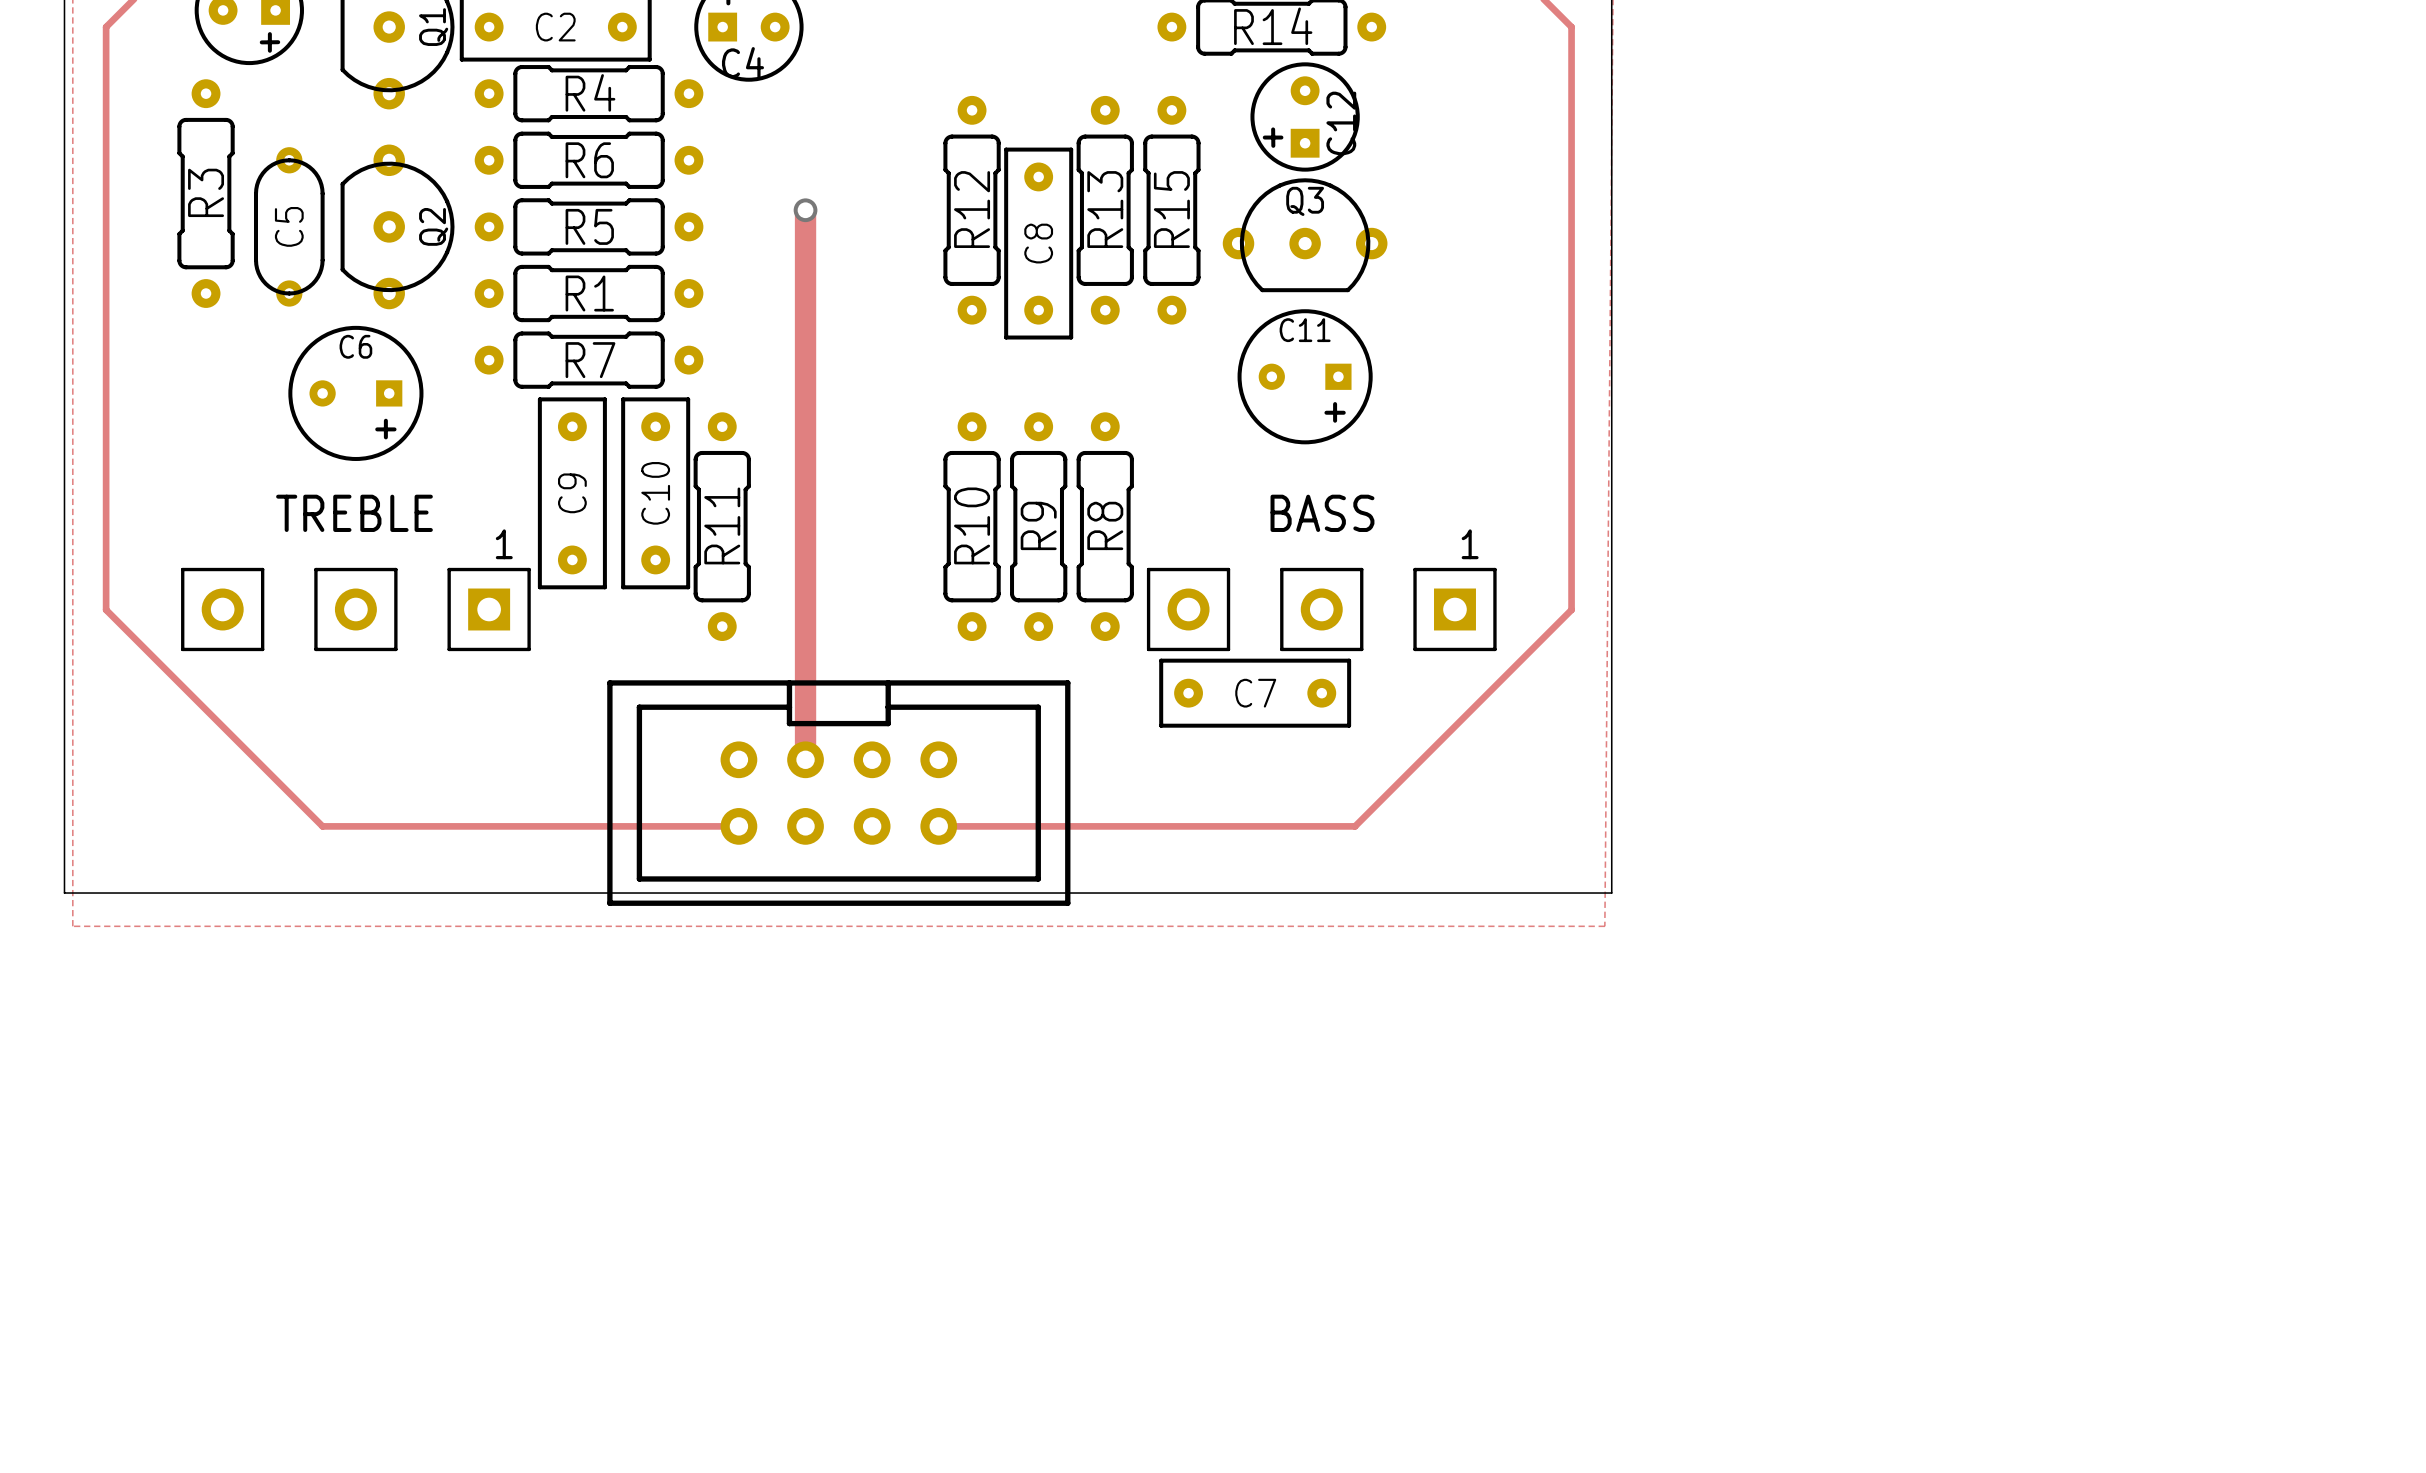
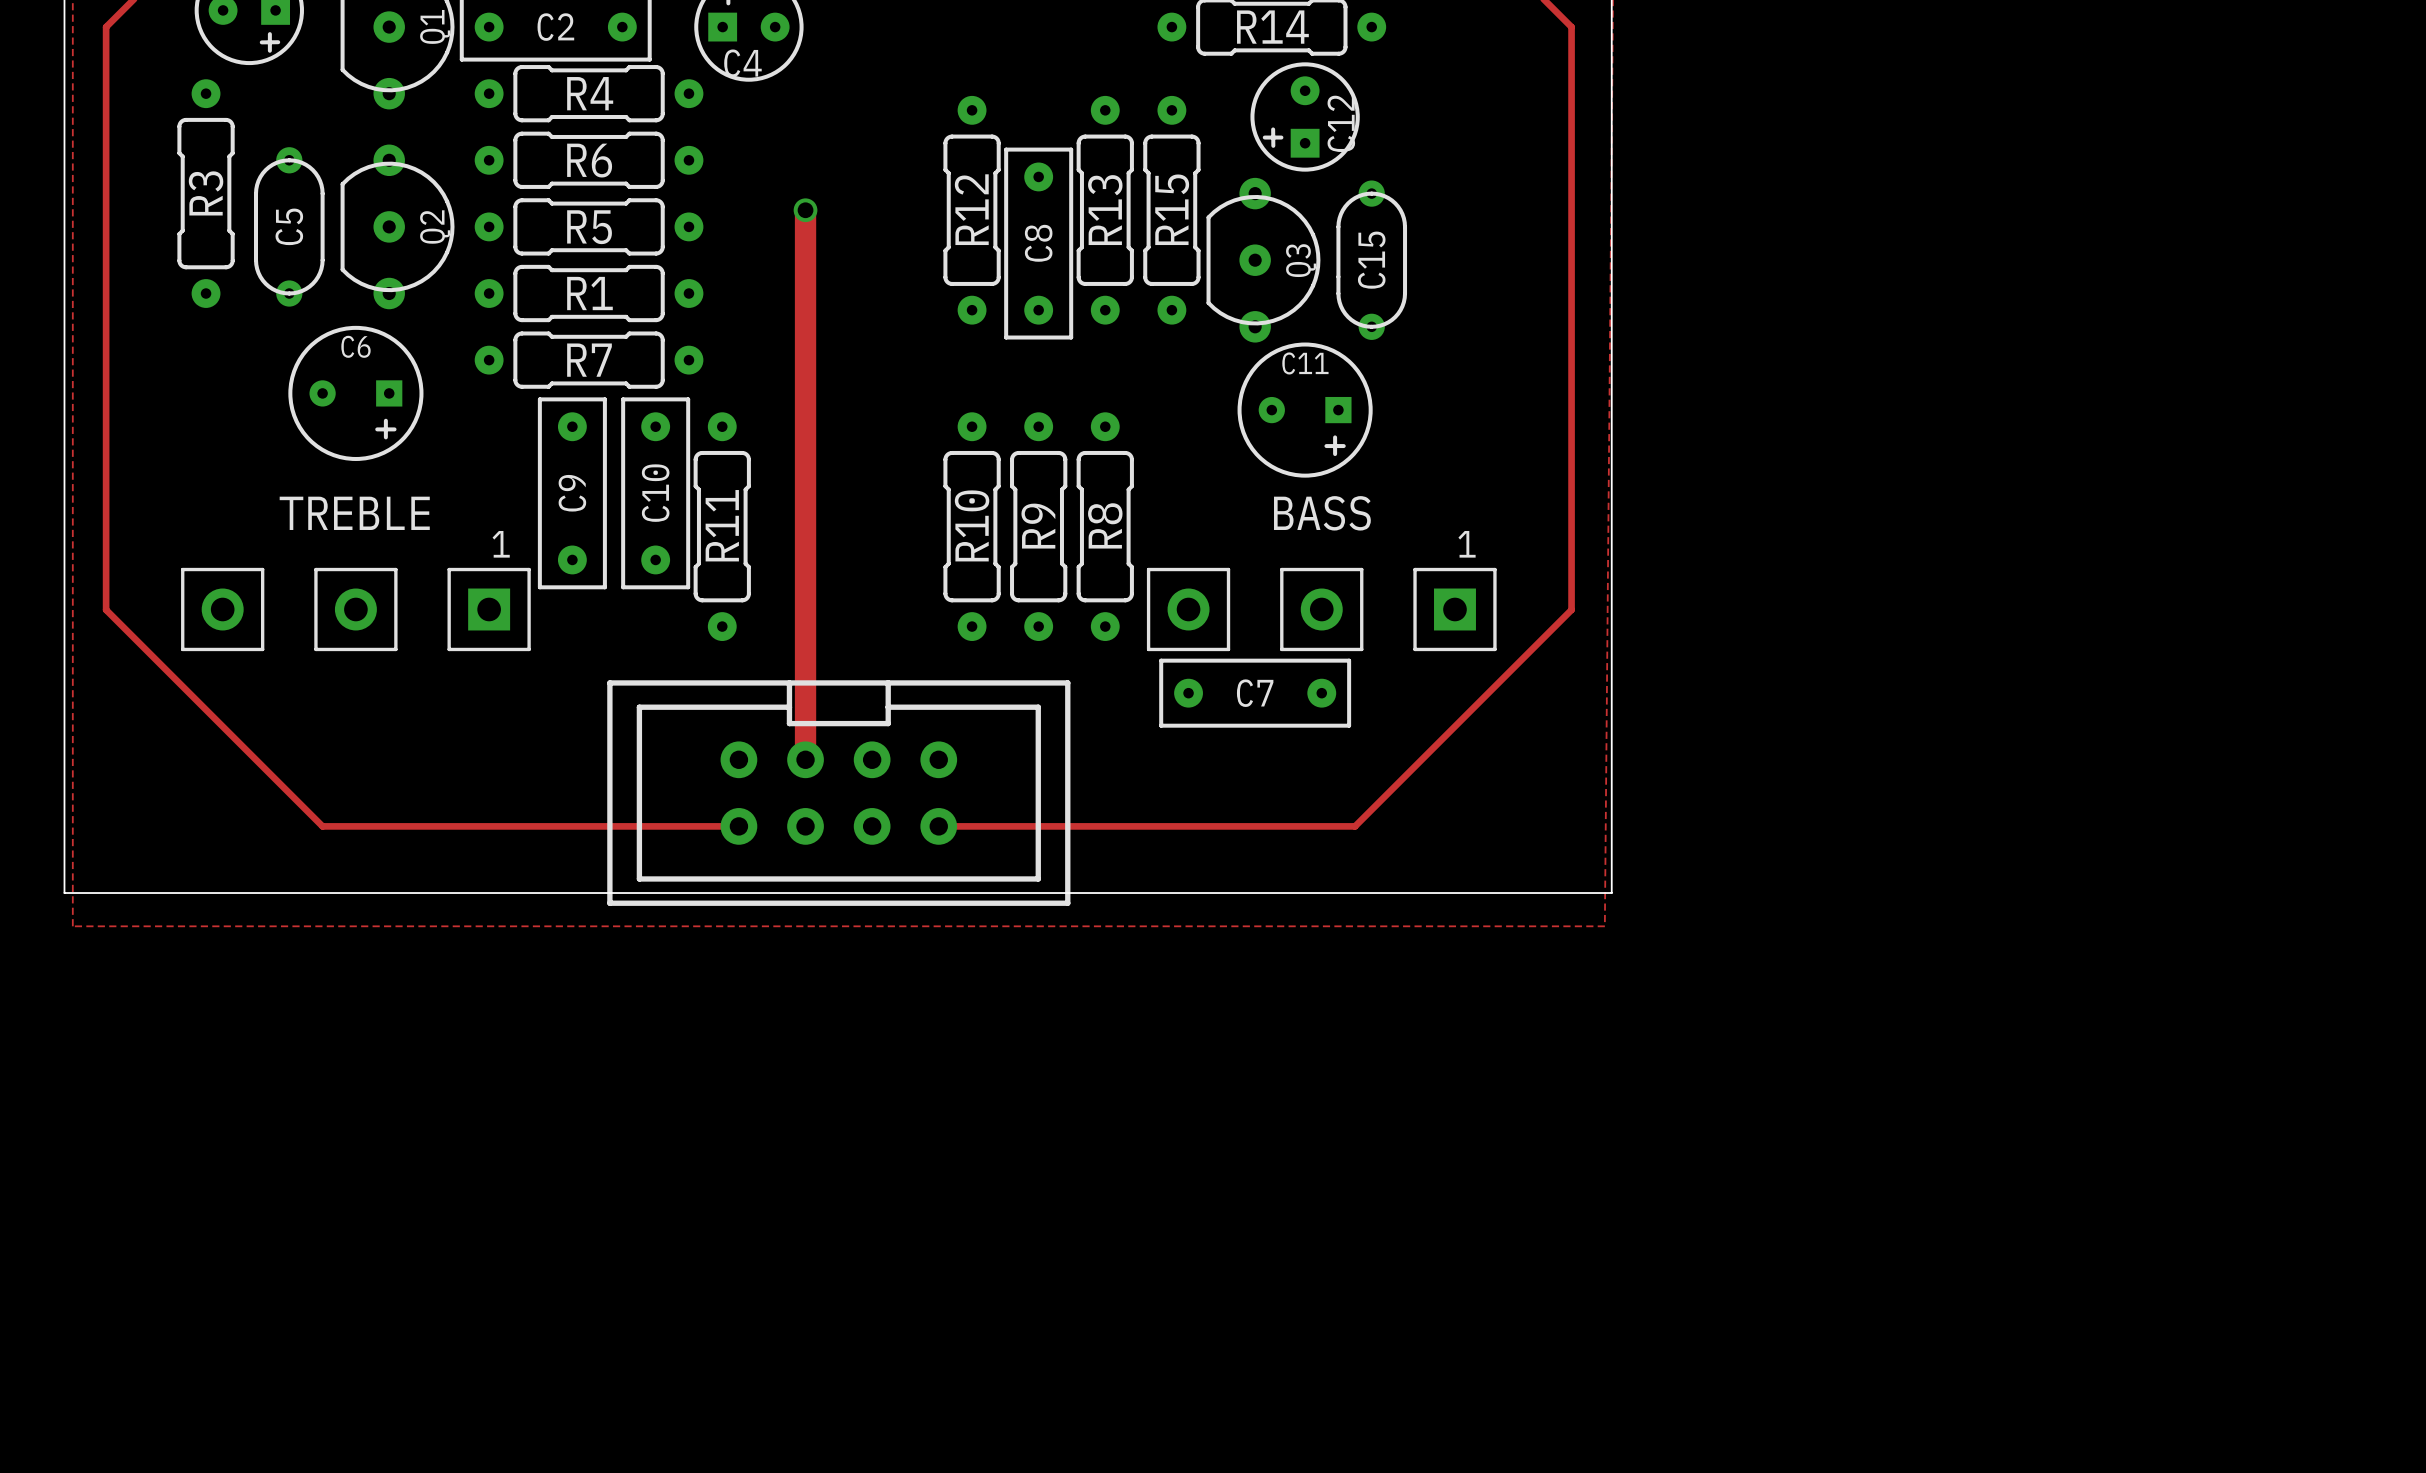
Q3 rotation: 0° (1305, 235) -> 90° clockwise (1263, 260)
C15: none -> (1371, 260)
C11 position: (1305, 376) -> (1305, 410)

